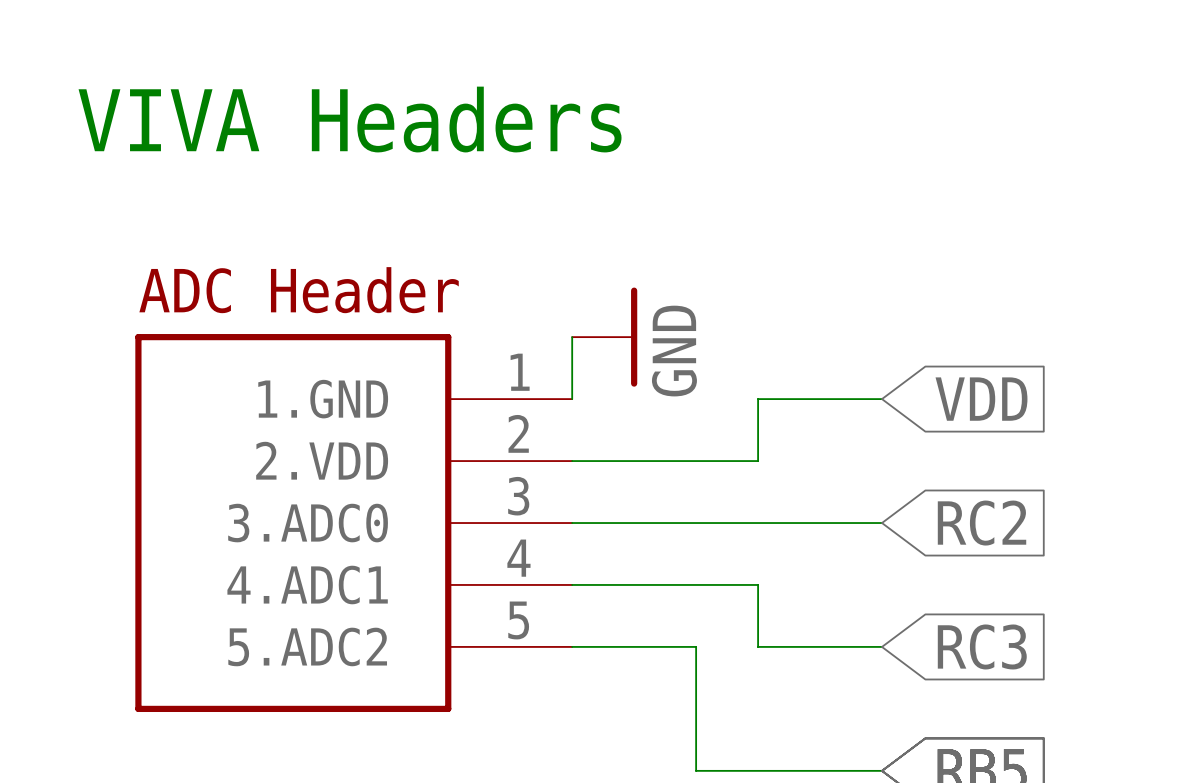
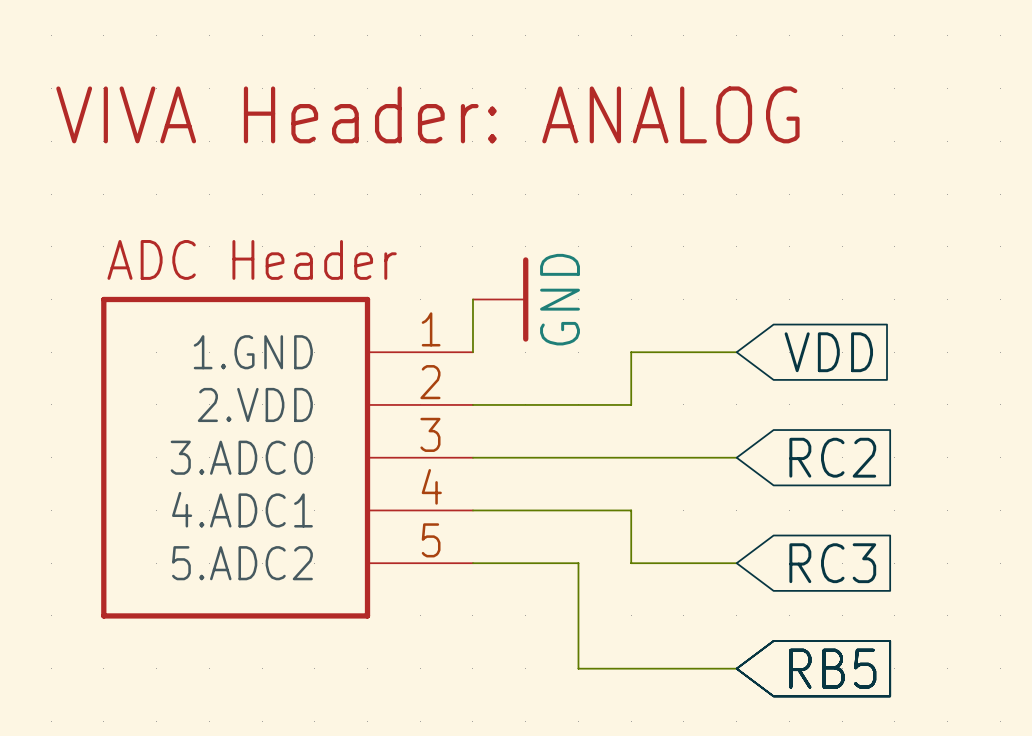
text: VIVA Headers (350, 119) -> VIVA Header: ANALOG (427, 114)

